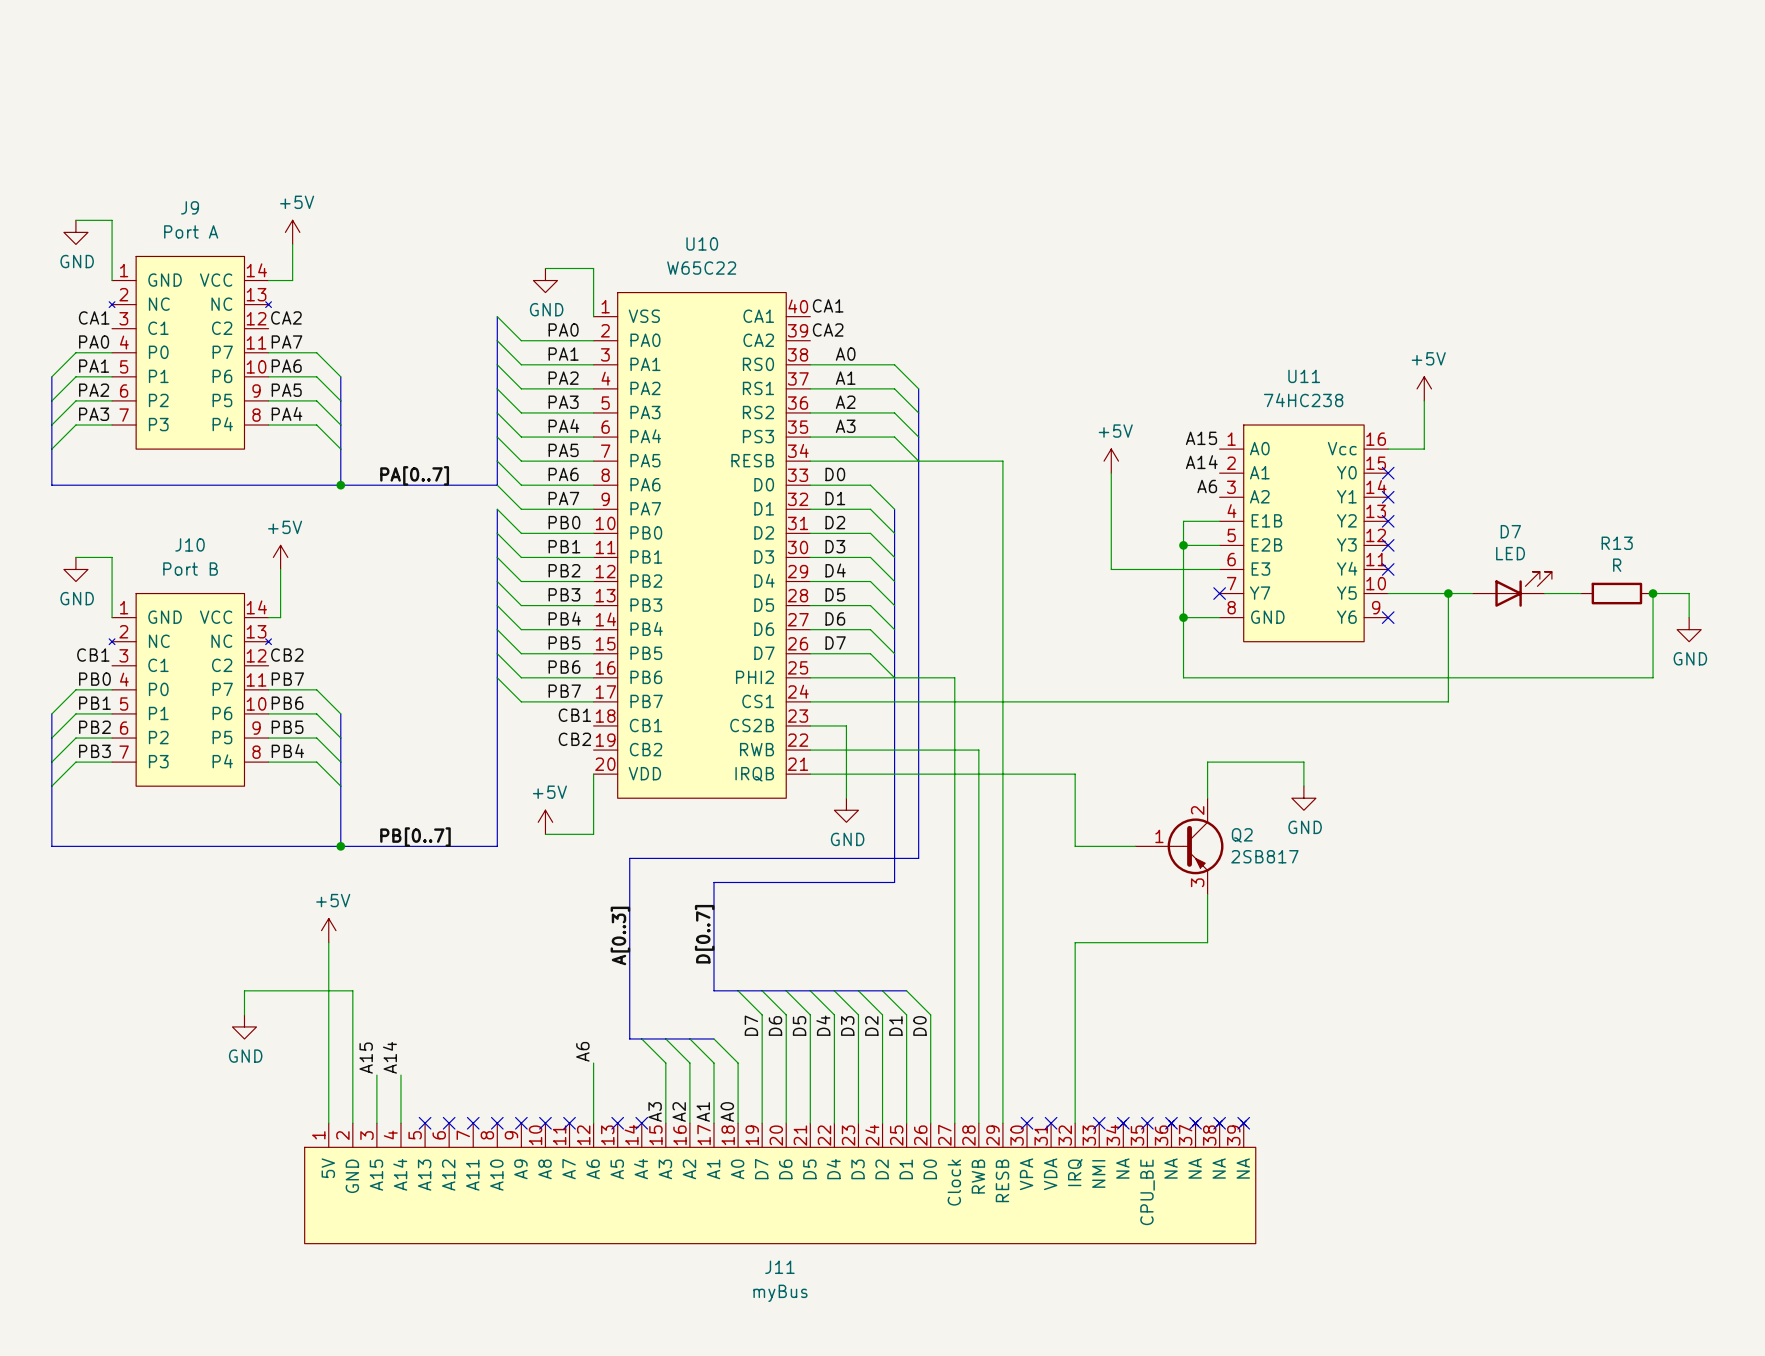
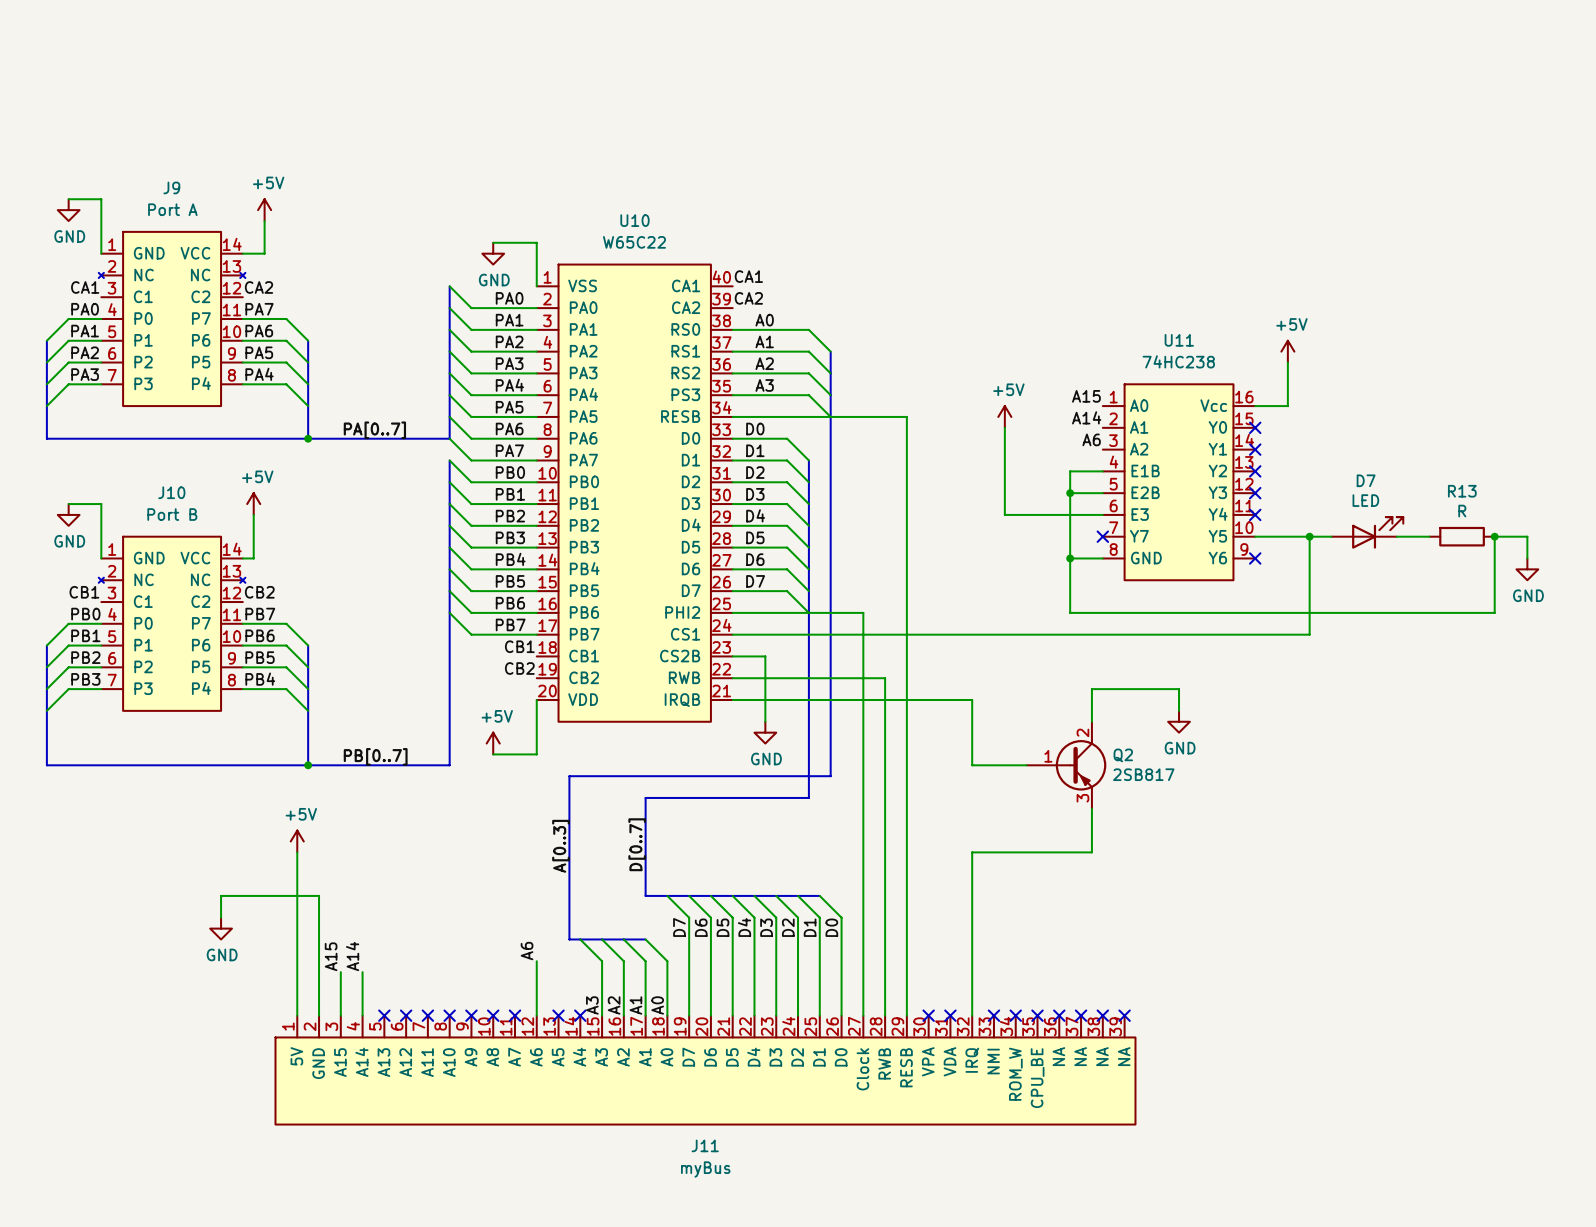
J11 symbol: [304, 1120, 1256, 1244] -> [275, 1015, 1136, 1125]

